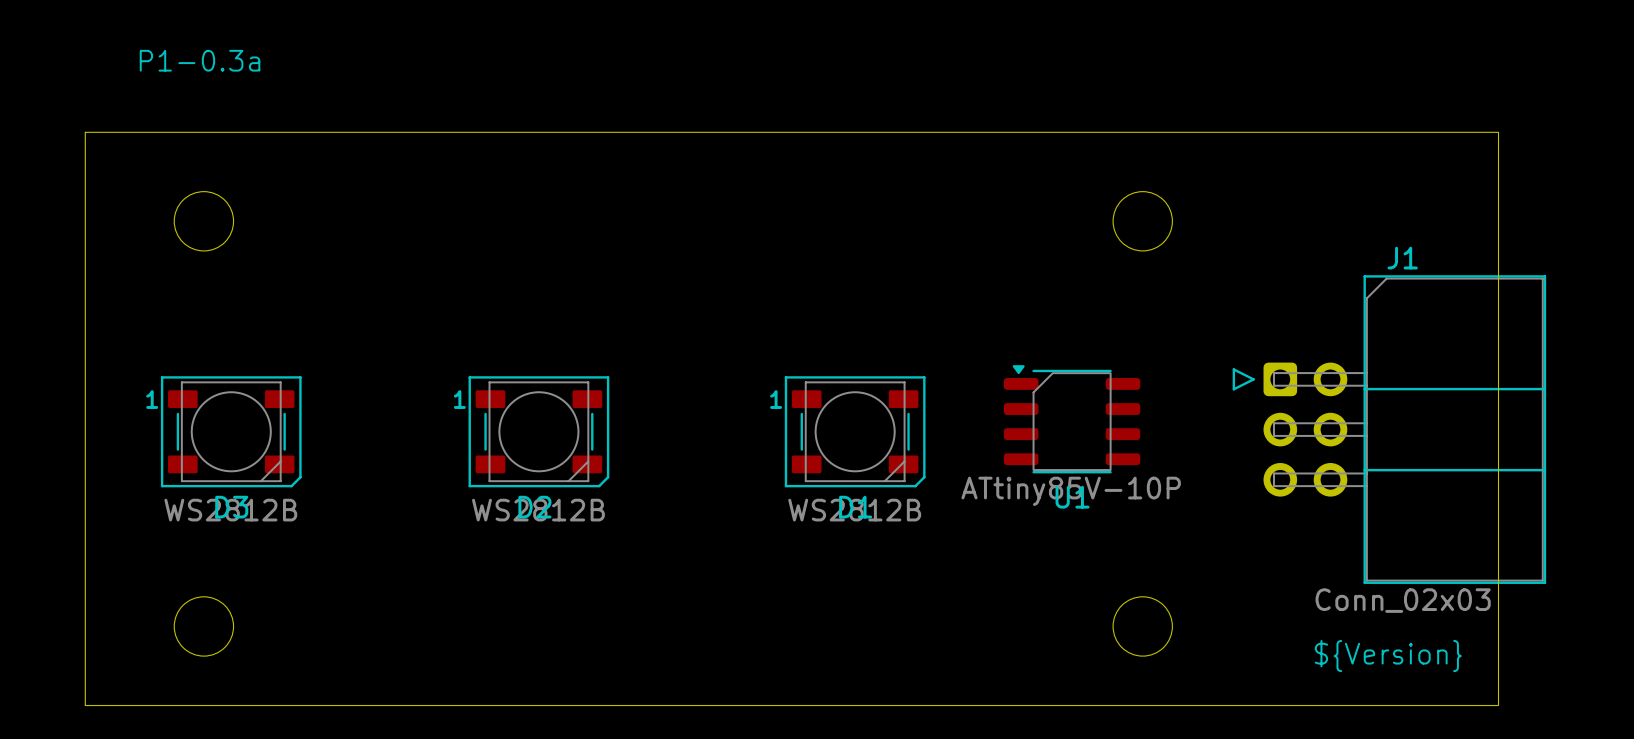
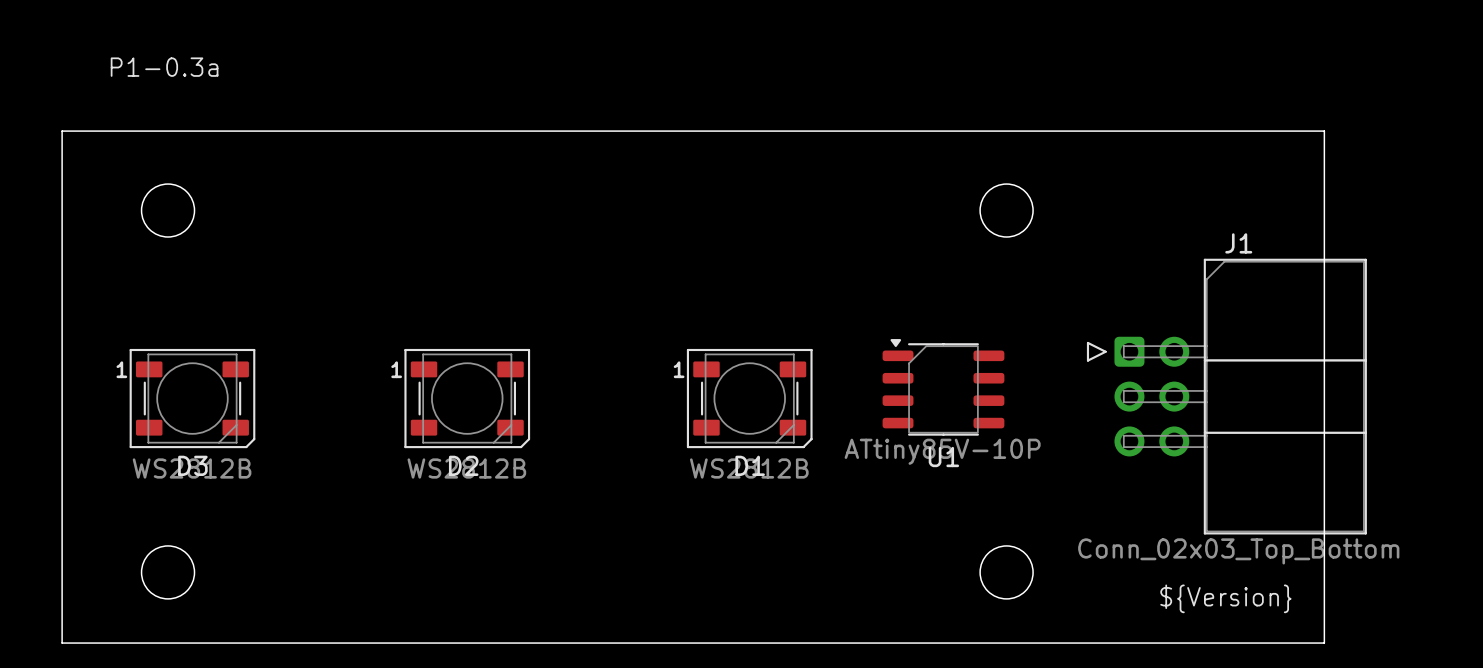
J1 value: Conn_02x03 (1403, 600) -> Conn_02x03_Top_Bottom (1238, 551)

